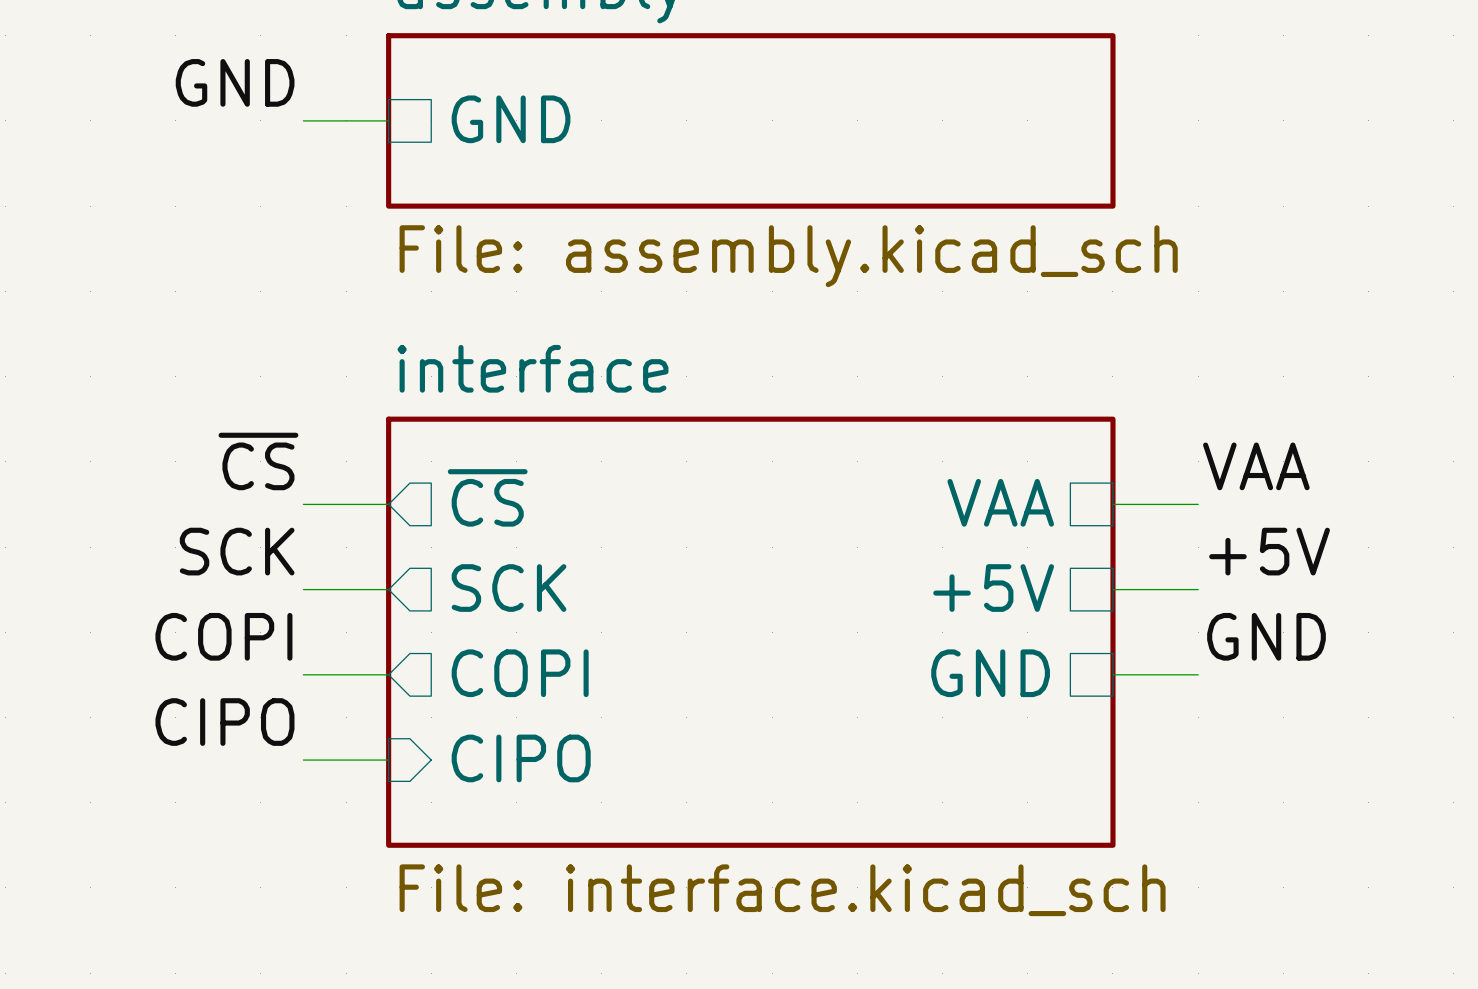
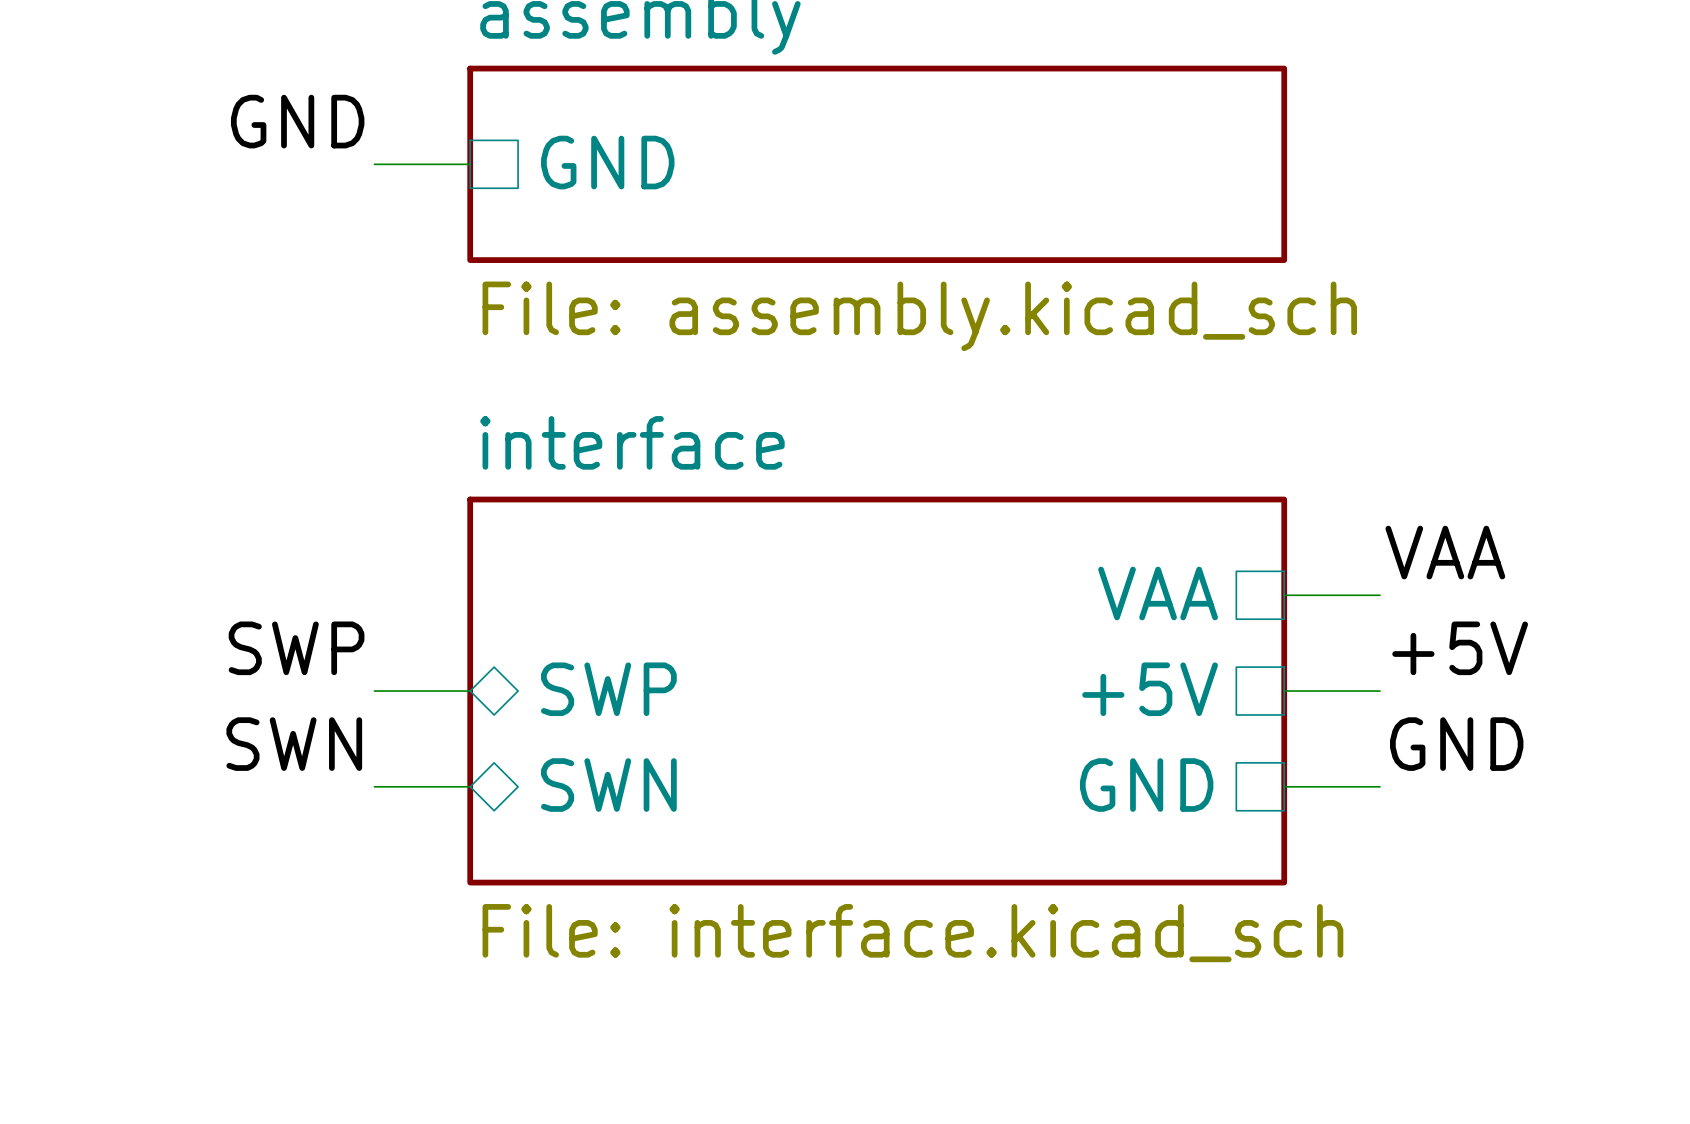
label: ~{CS} (258, 461) -> none
sheet pin: ~{CS} (487, 497) -> none
wire: (303, 504) (388, 504) -> none
label: SCK (237, 551) -> SWP (296, 648)
sheet pin shape: output (509, 588) -> bidirectional (608, 689)
sheet pin: SCK (509, 588) -> SWP (608, 689)
sheet interface: none -> File: interface.kicad_sch (877, 691)
sheet interface: File: interface.kicad_sch (750, 632) -> none
label: COPI (223, 636) -> SWN (294, 744)
sheet pin shape: output (520, 673) -> bidirectional (608, 785)
sheet pin: COPI (520, 673) -> SWN (608, 785)
label: CIPO (224, 722) -> none
sheet pin: CIPO (521, 758) -> none
wire: (303, 760) (388, 760) -> none

